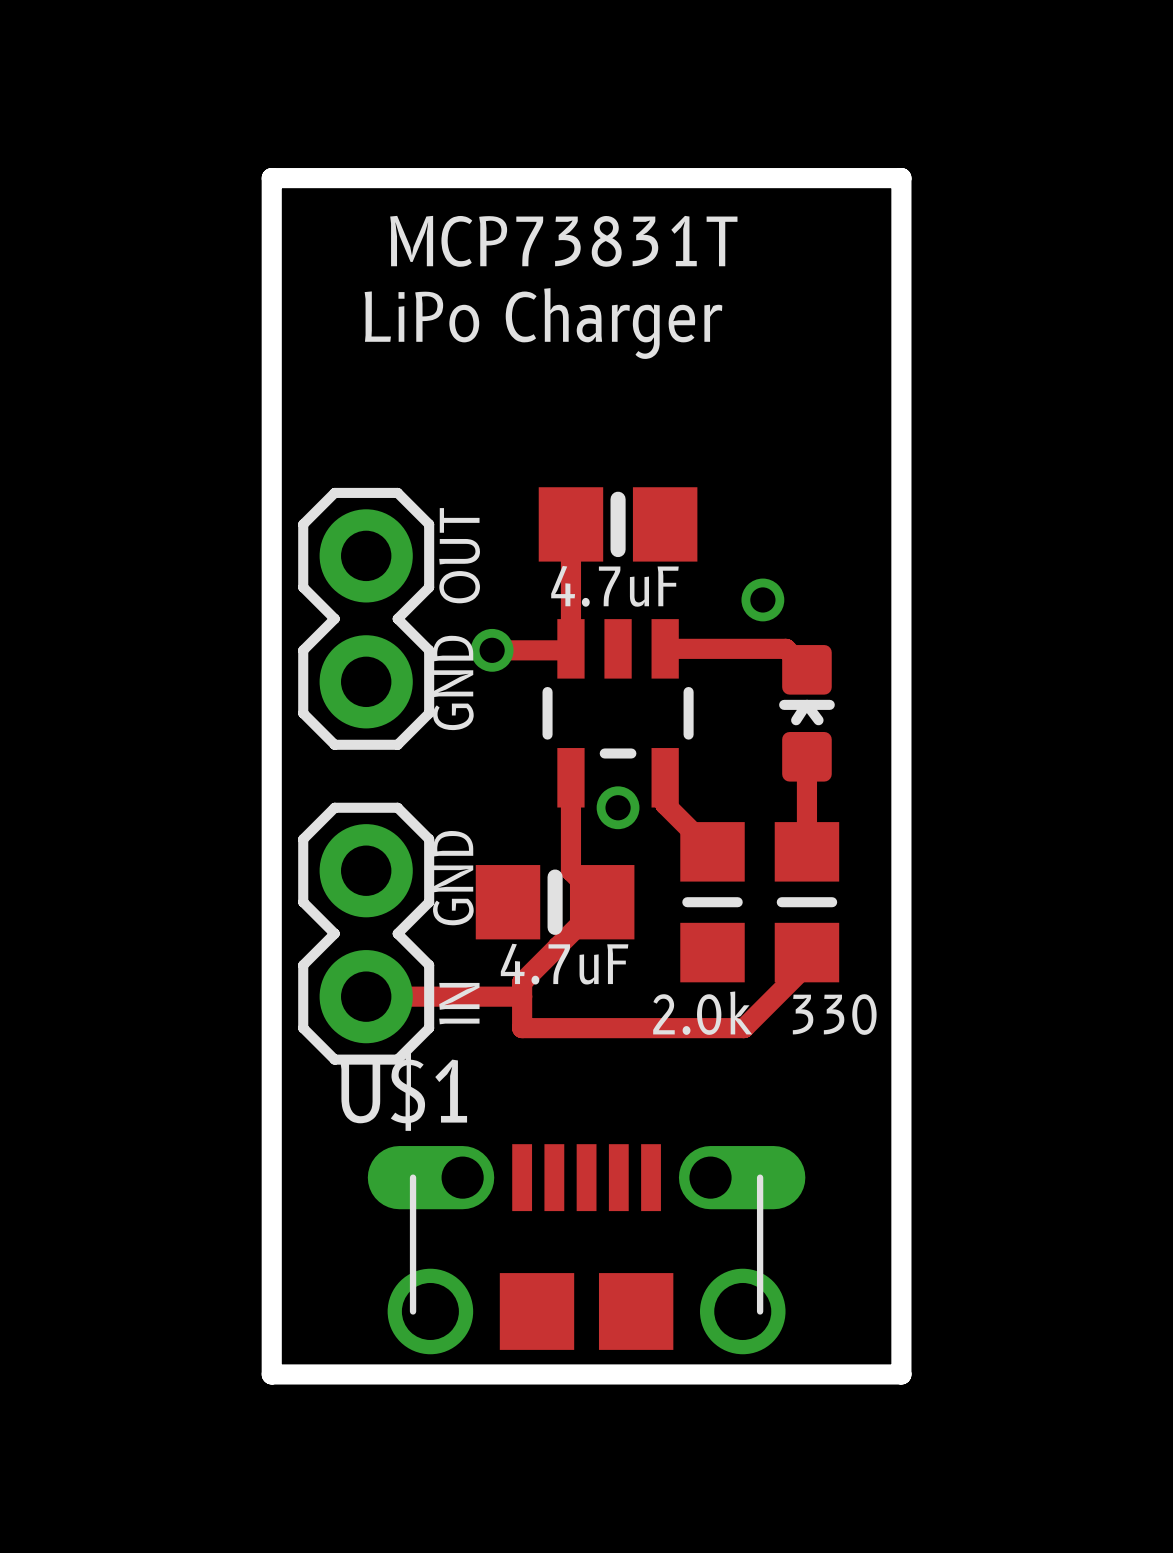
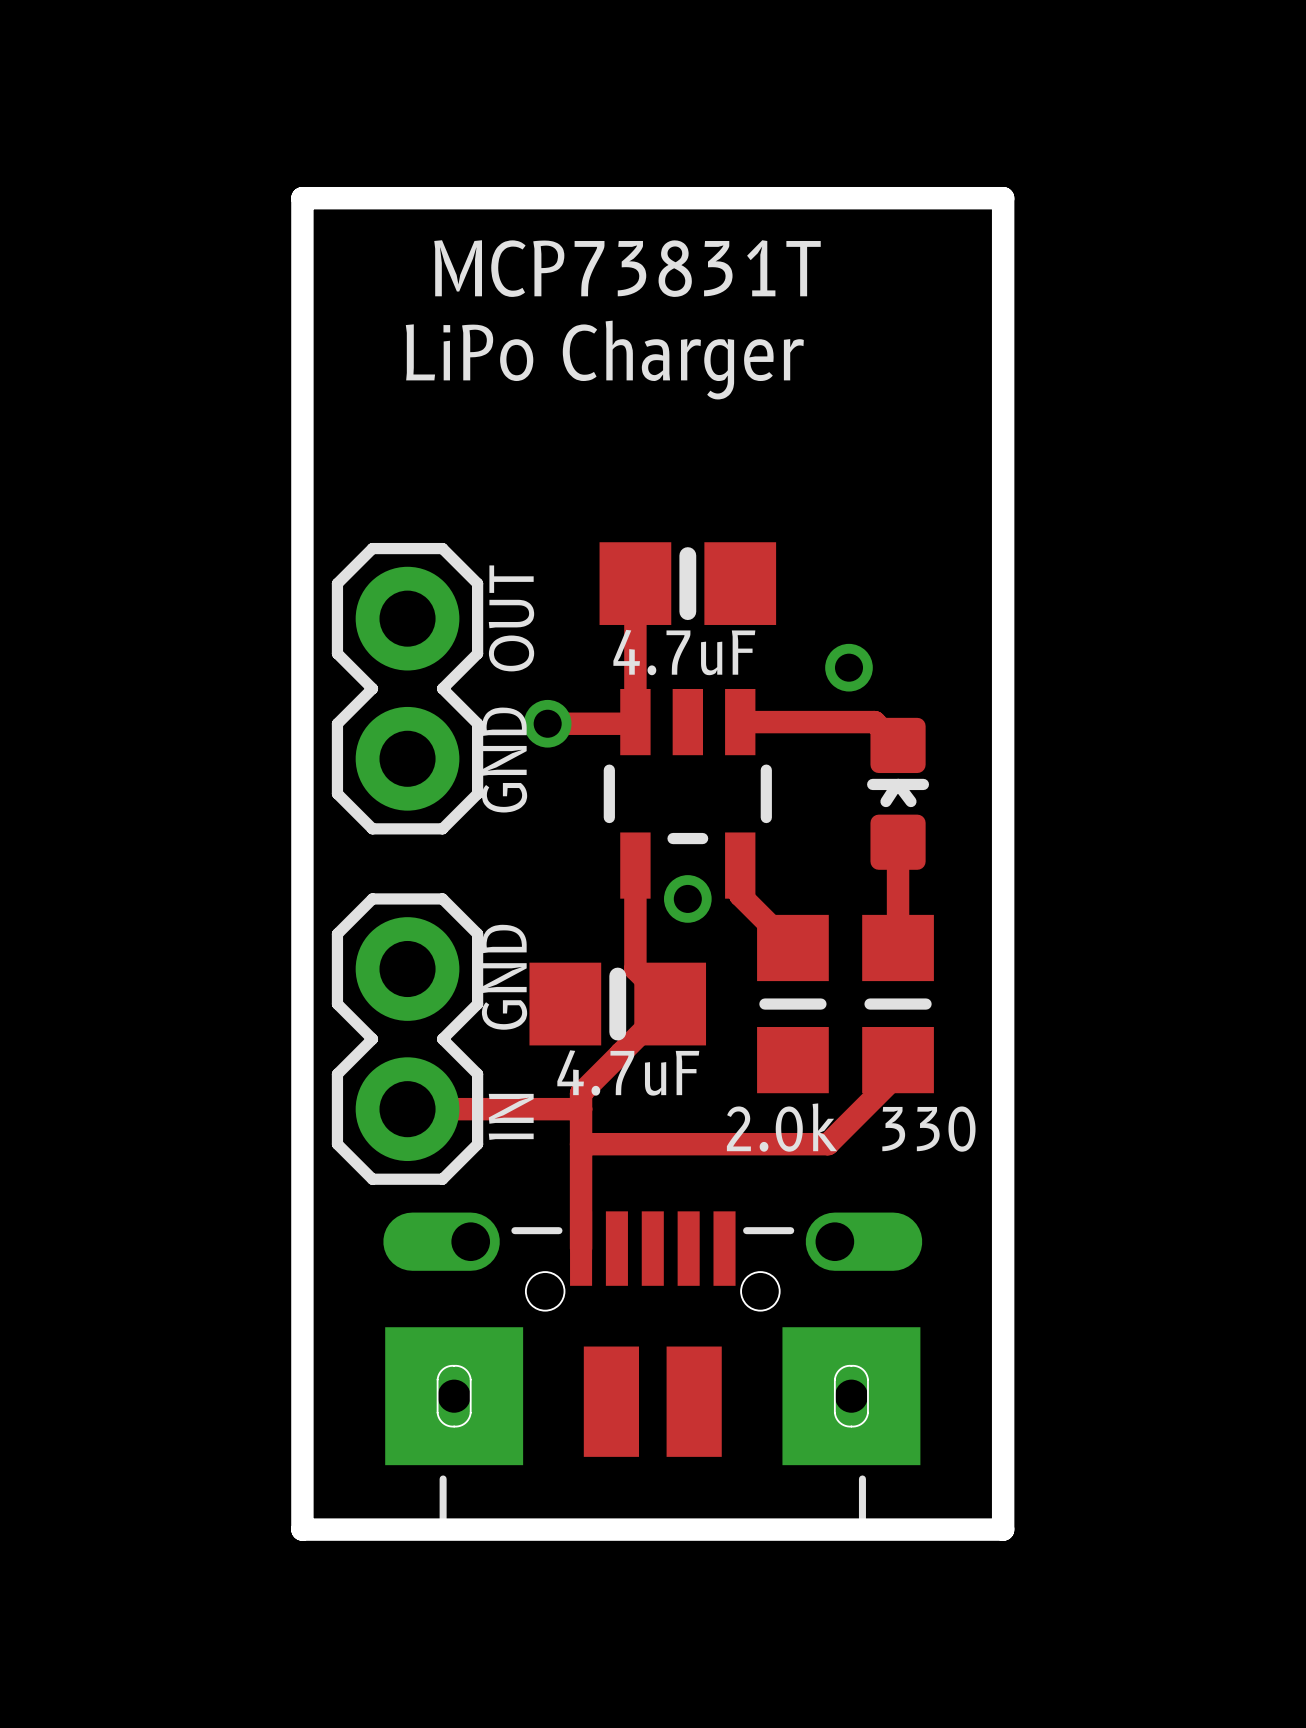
track: none -> (581, 1144) (581, 1248)
part: none -> (652, 1371)
U$1: (586, 1249) -> none

